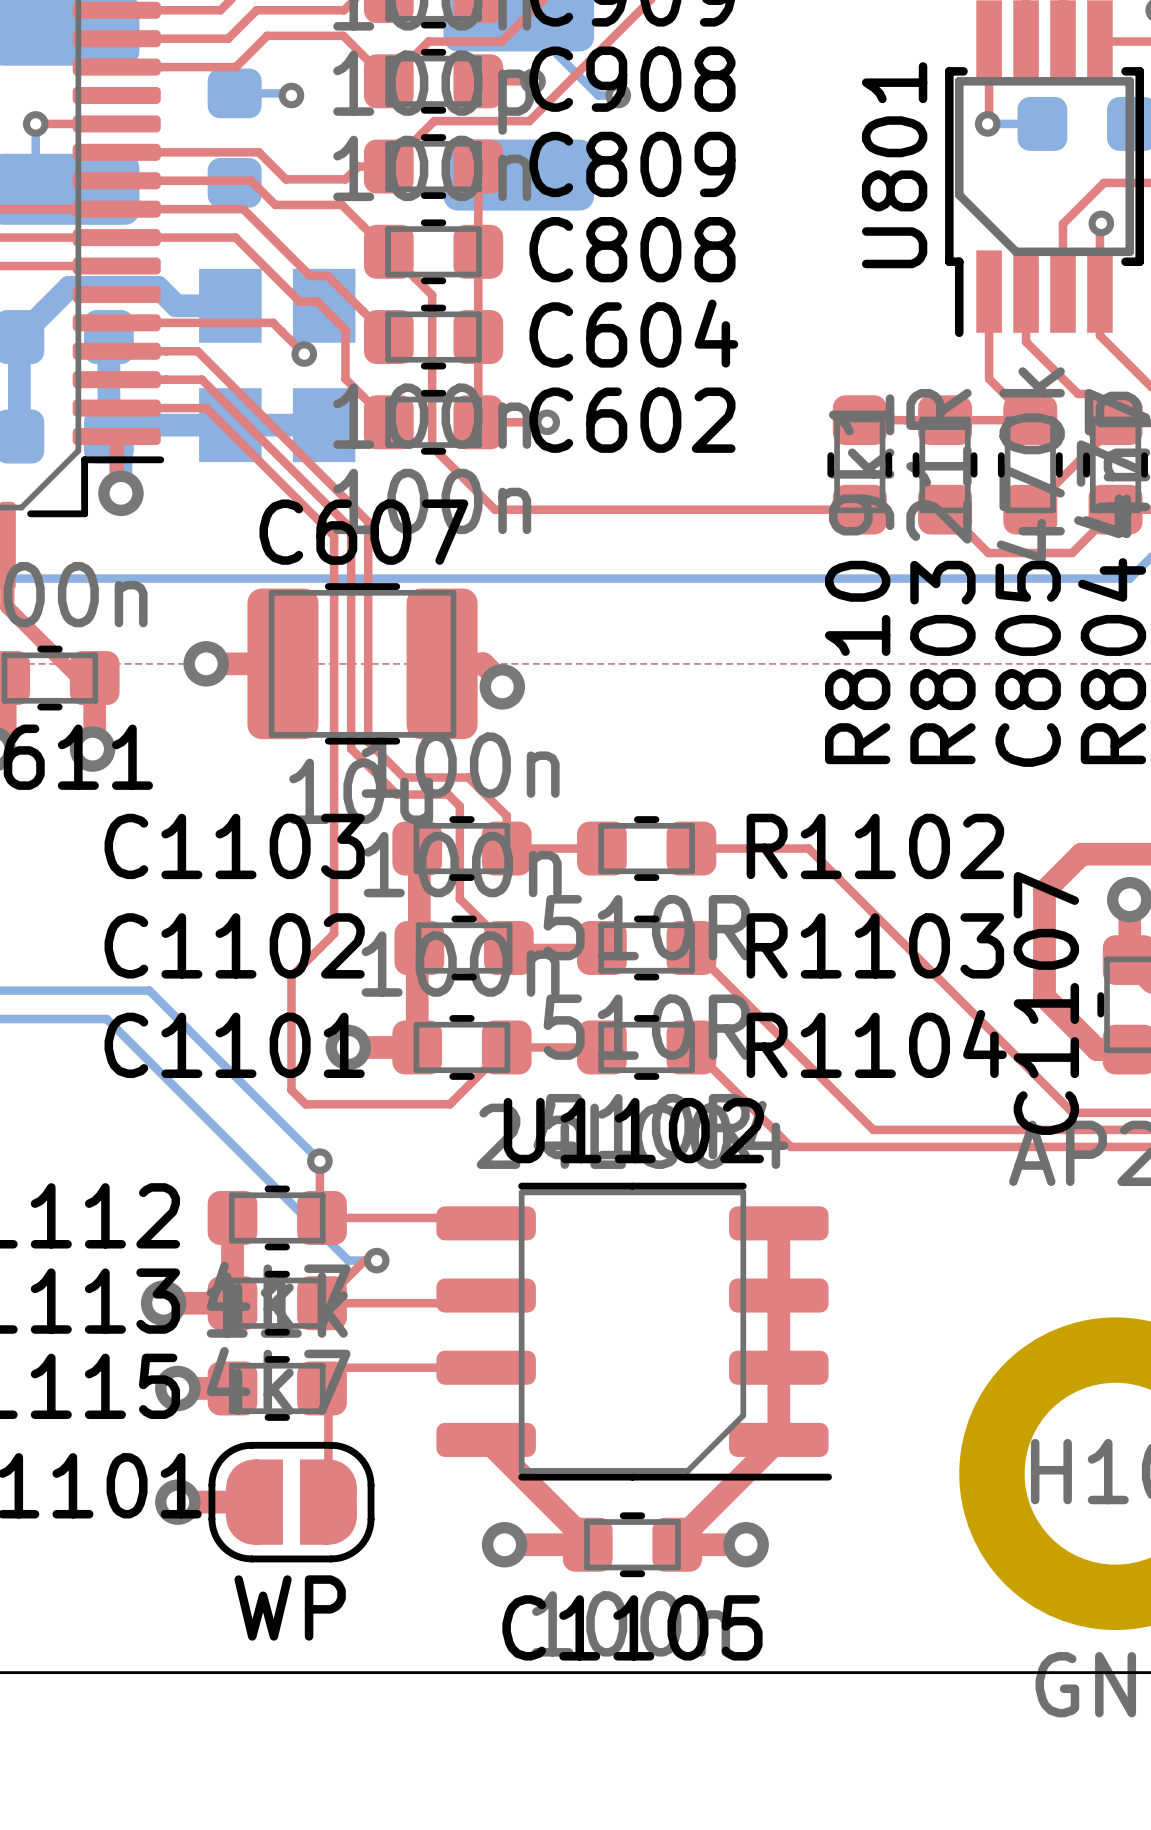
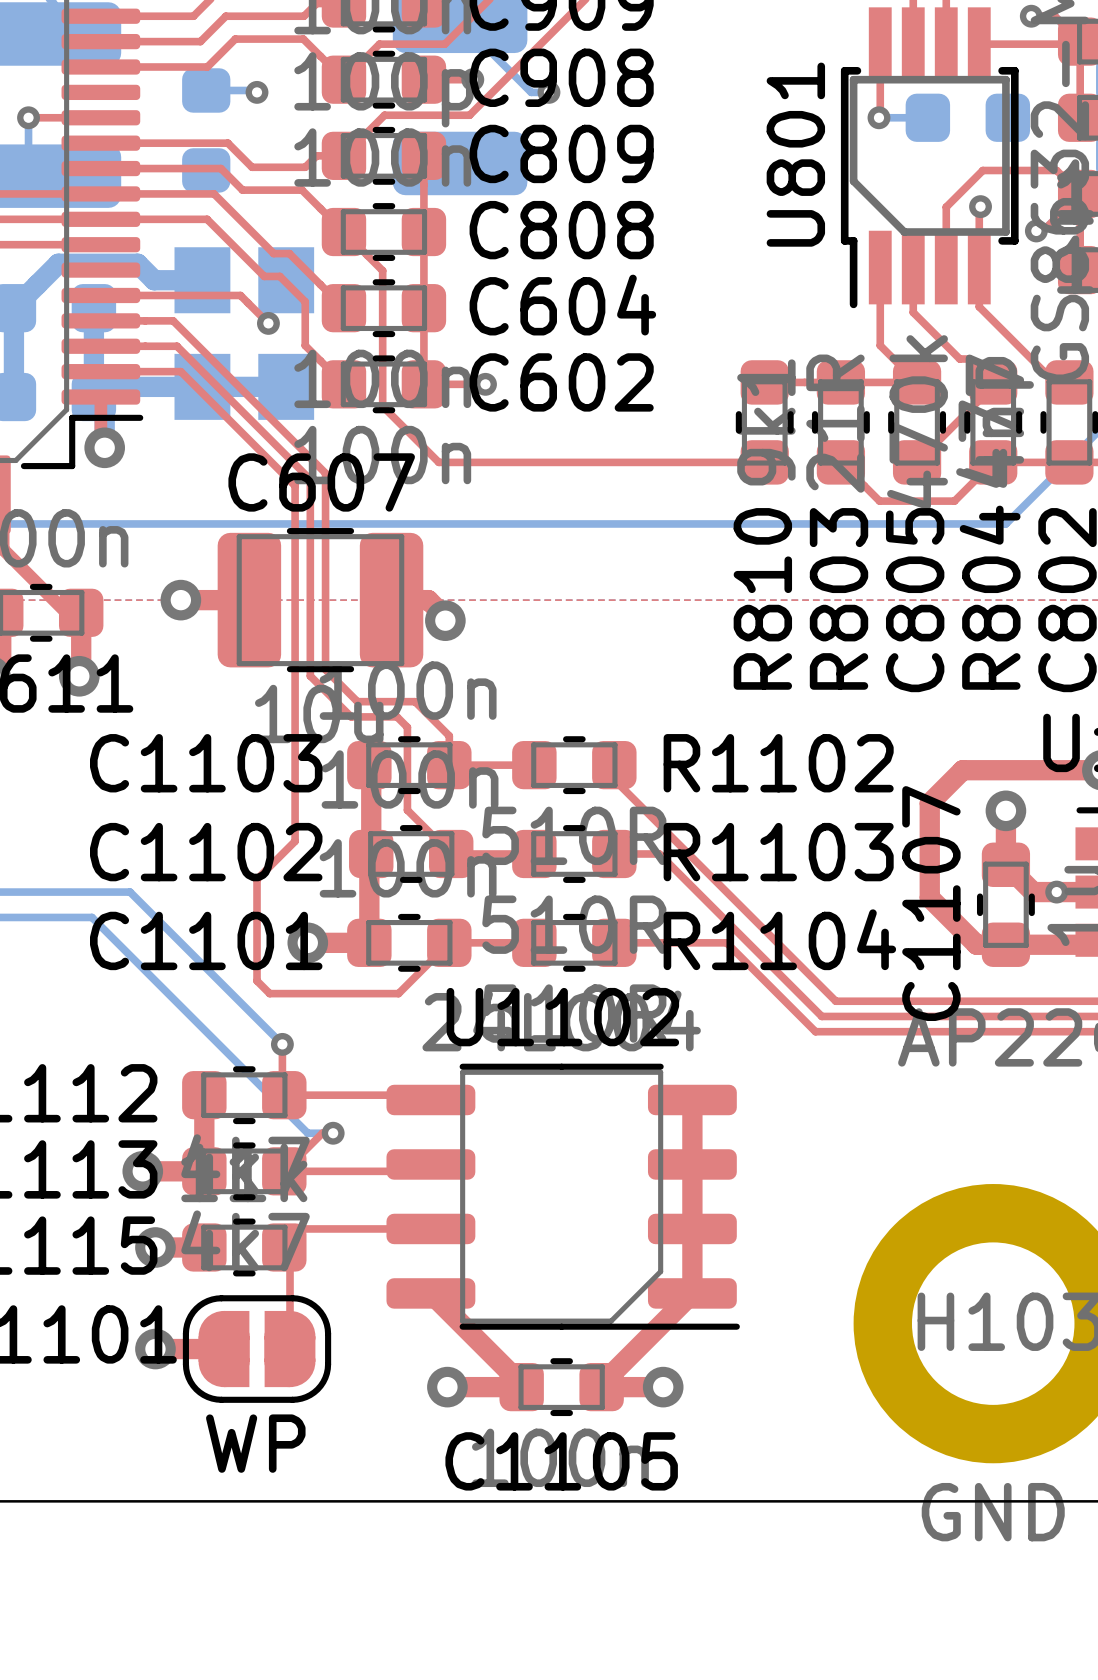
top track: (691, 848) (808, 848) (1072, 1112) -> (614, 765) (614, 779) (835, 1001) (955, 1001)
top track: (691, 948) (873, 1129) (923, 1129) -> (614, 853) (659, 853) (821, 1016)
top track: (691, 1047) (790, 1146) (916, 1146) -> (614, 942) (726, 942) (815, 1031)

